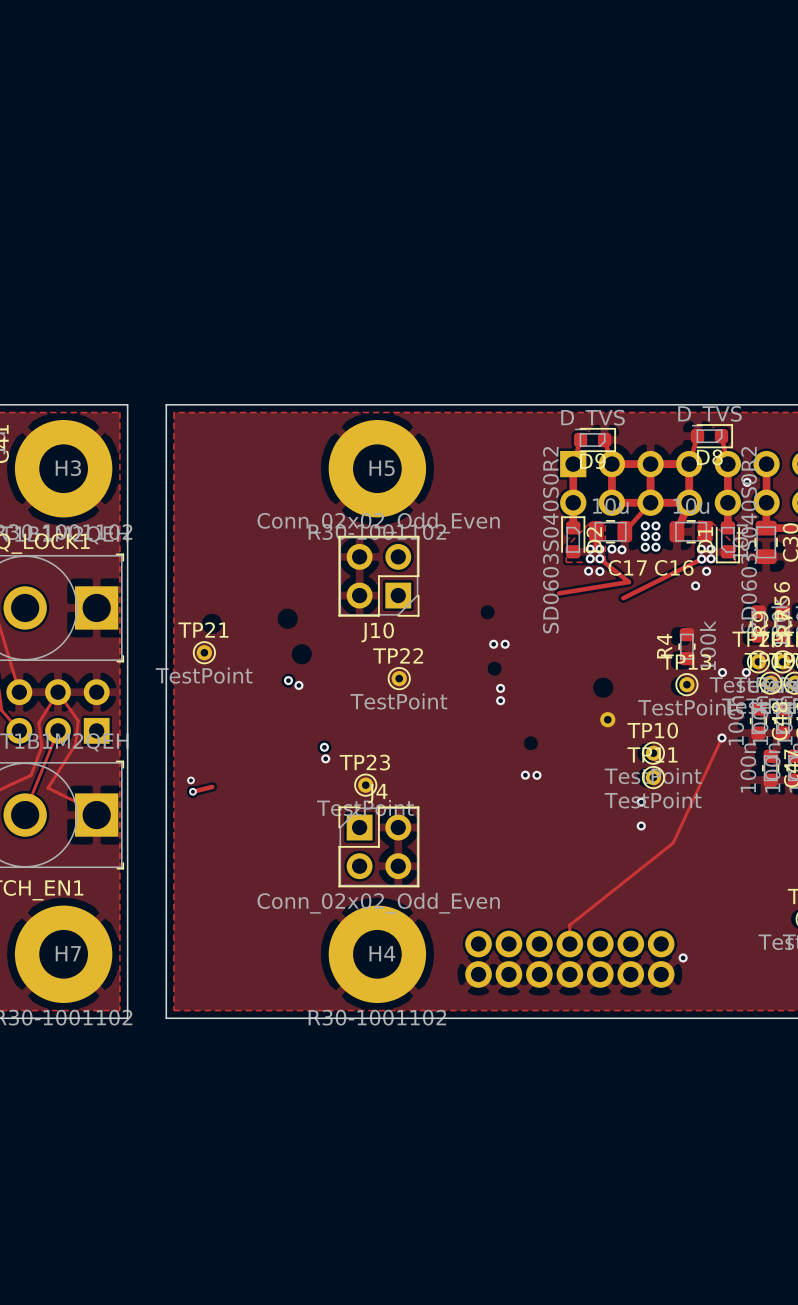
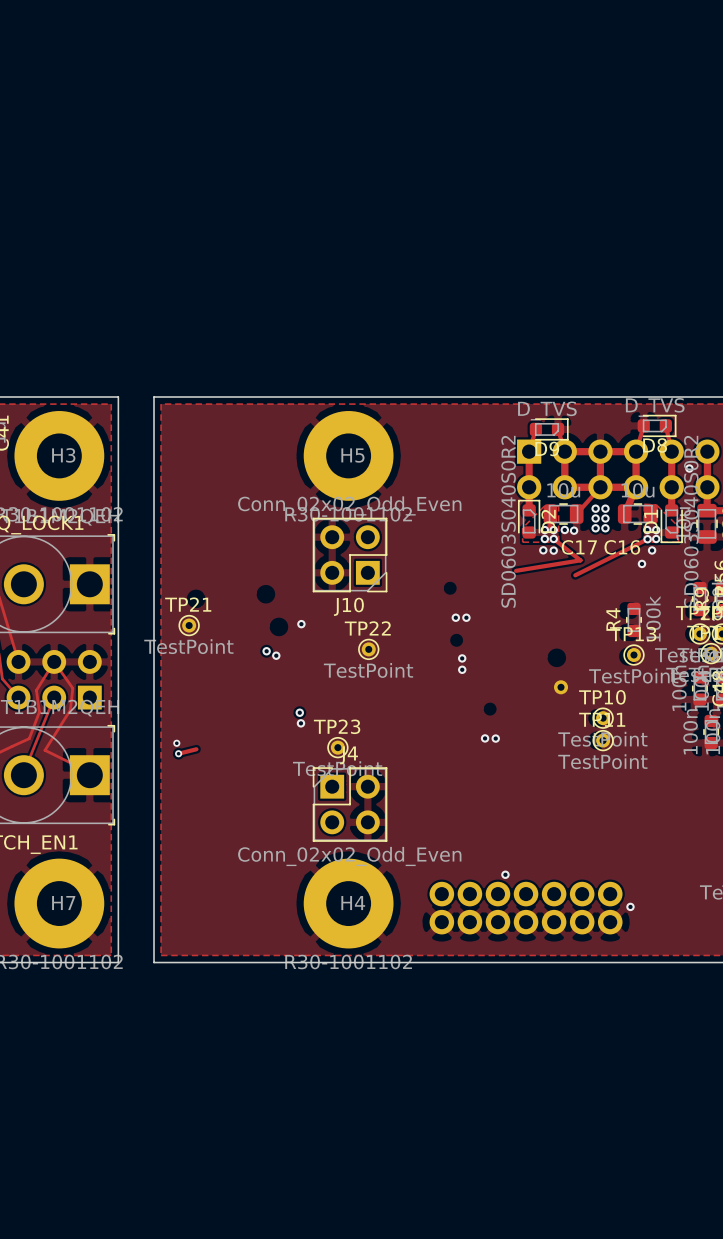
via: none -> (301, 624)
via: (722, 672) -> none
via: (746, 672) -> none
track: (721, 737) (673, 843) (569, 925) (569, 944) -> none
via: (721, 737) -> none
via: (641, 802) -> none
via: (641, 825) -> none
via: none -> (505, 874)

